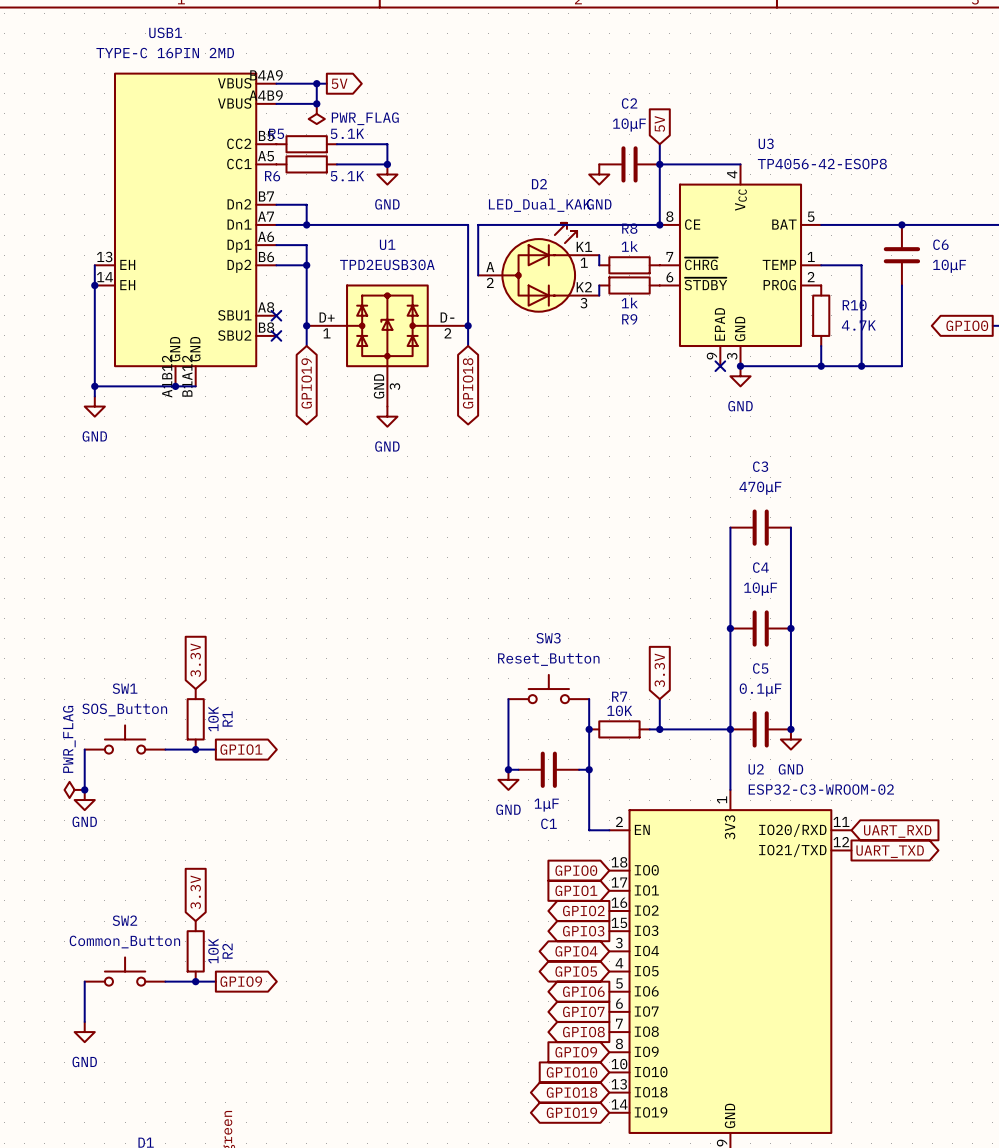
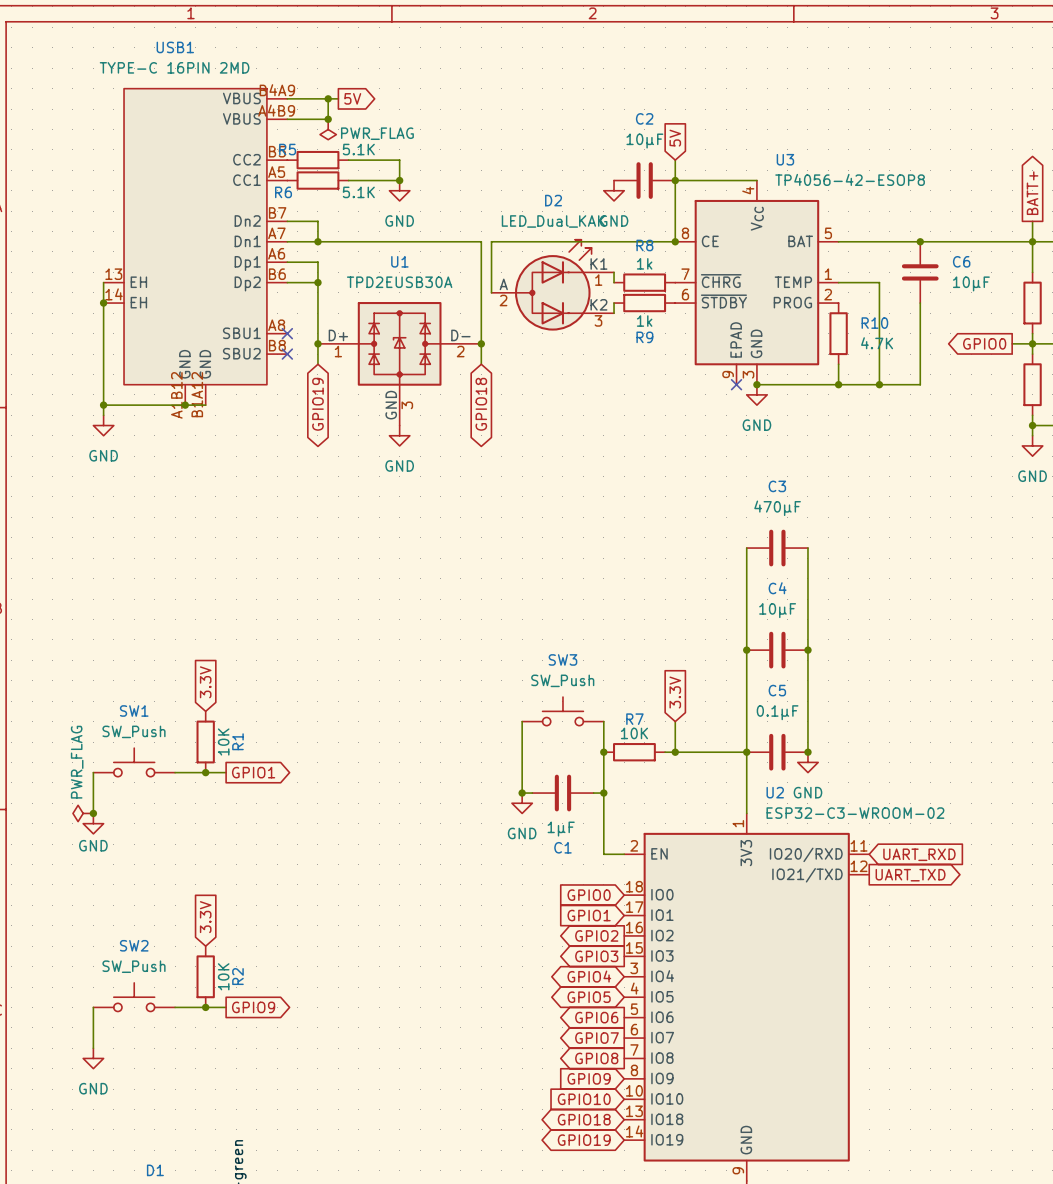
SW3 value: Reset_Button (548, 659) -> SW_Push (562, 680)
SW1 value: SOS_Button (124, 709) -> SW_Push (133, 731)
SW2 value: Common_Button (124, 942) -> SW_Push (133, 966)

